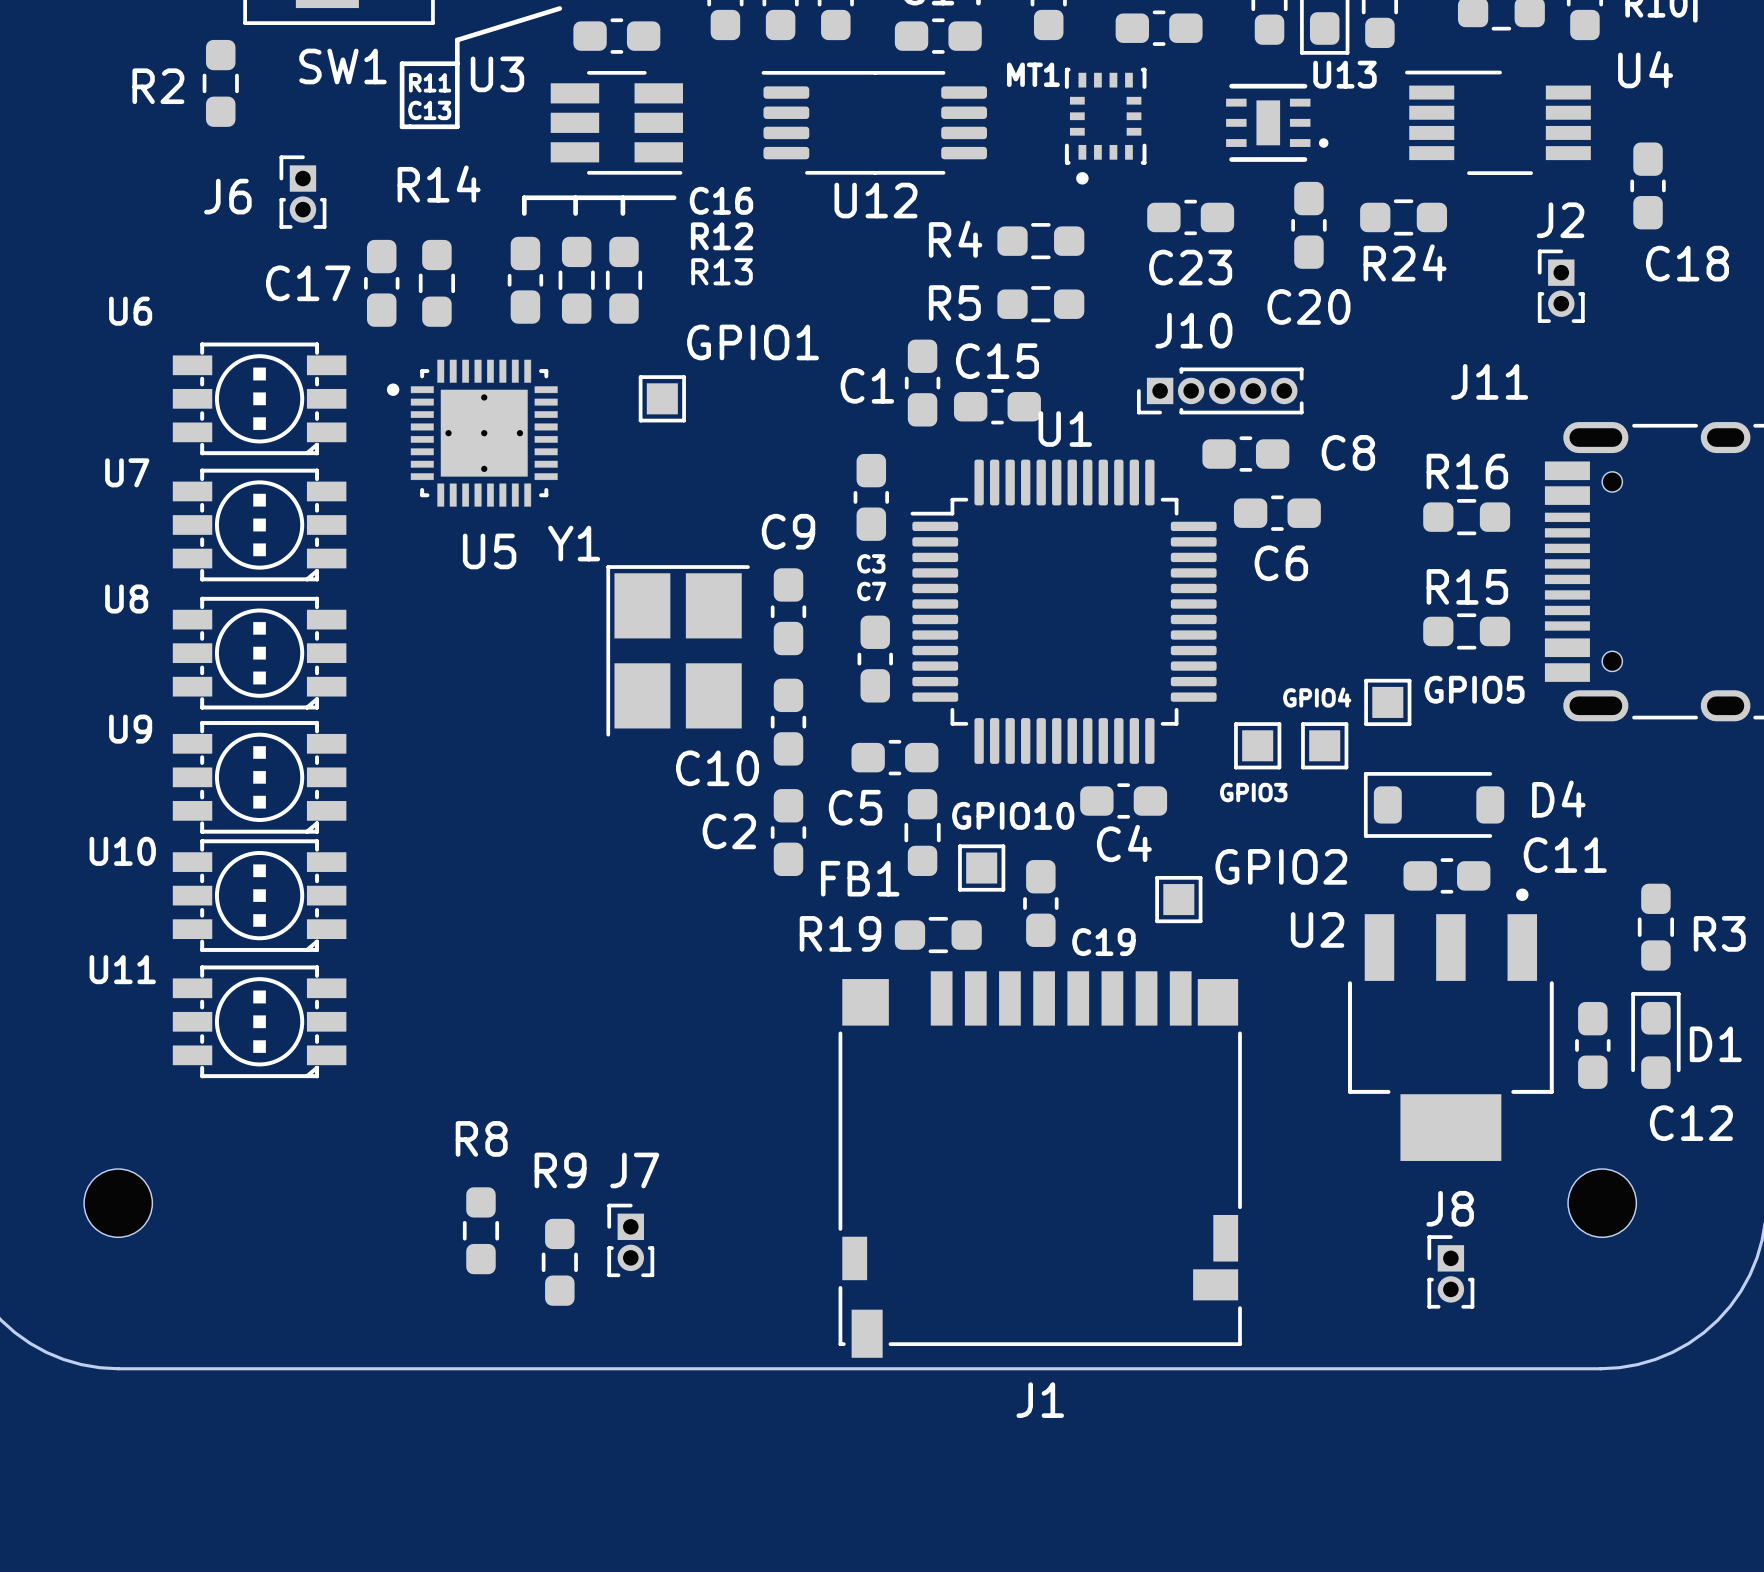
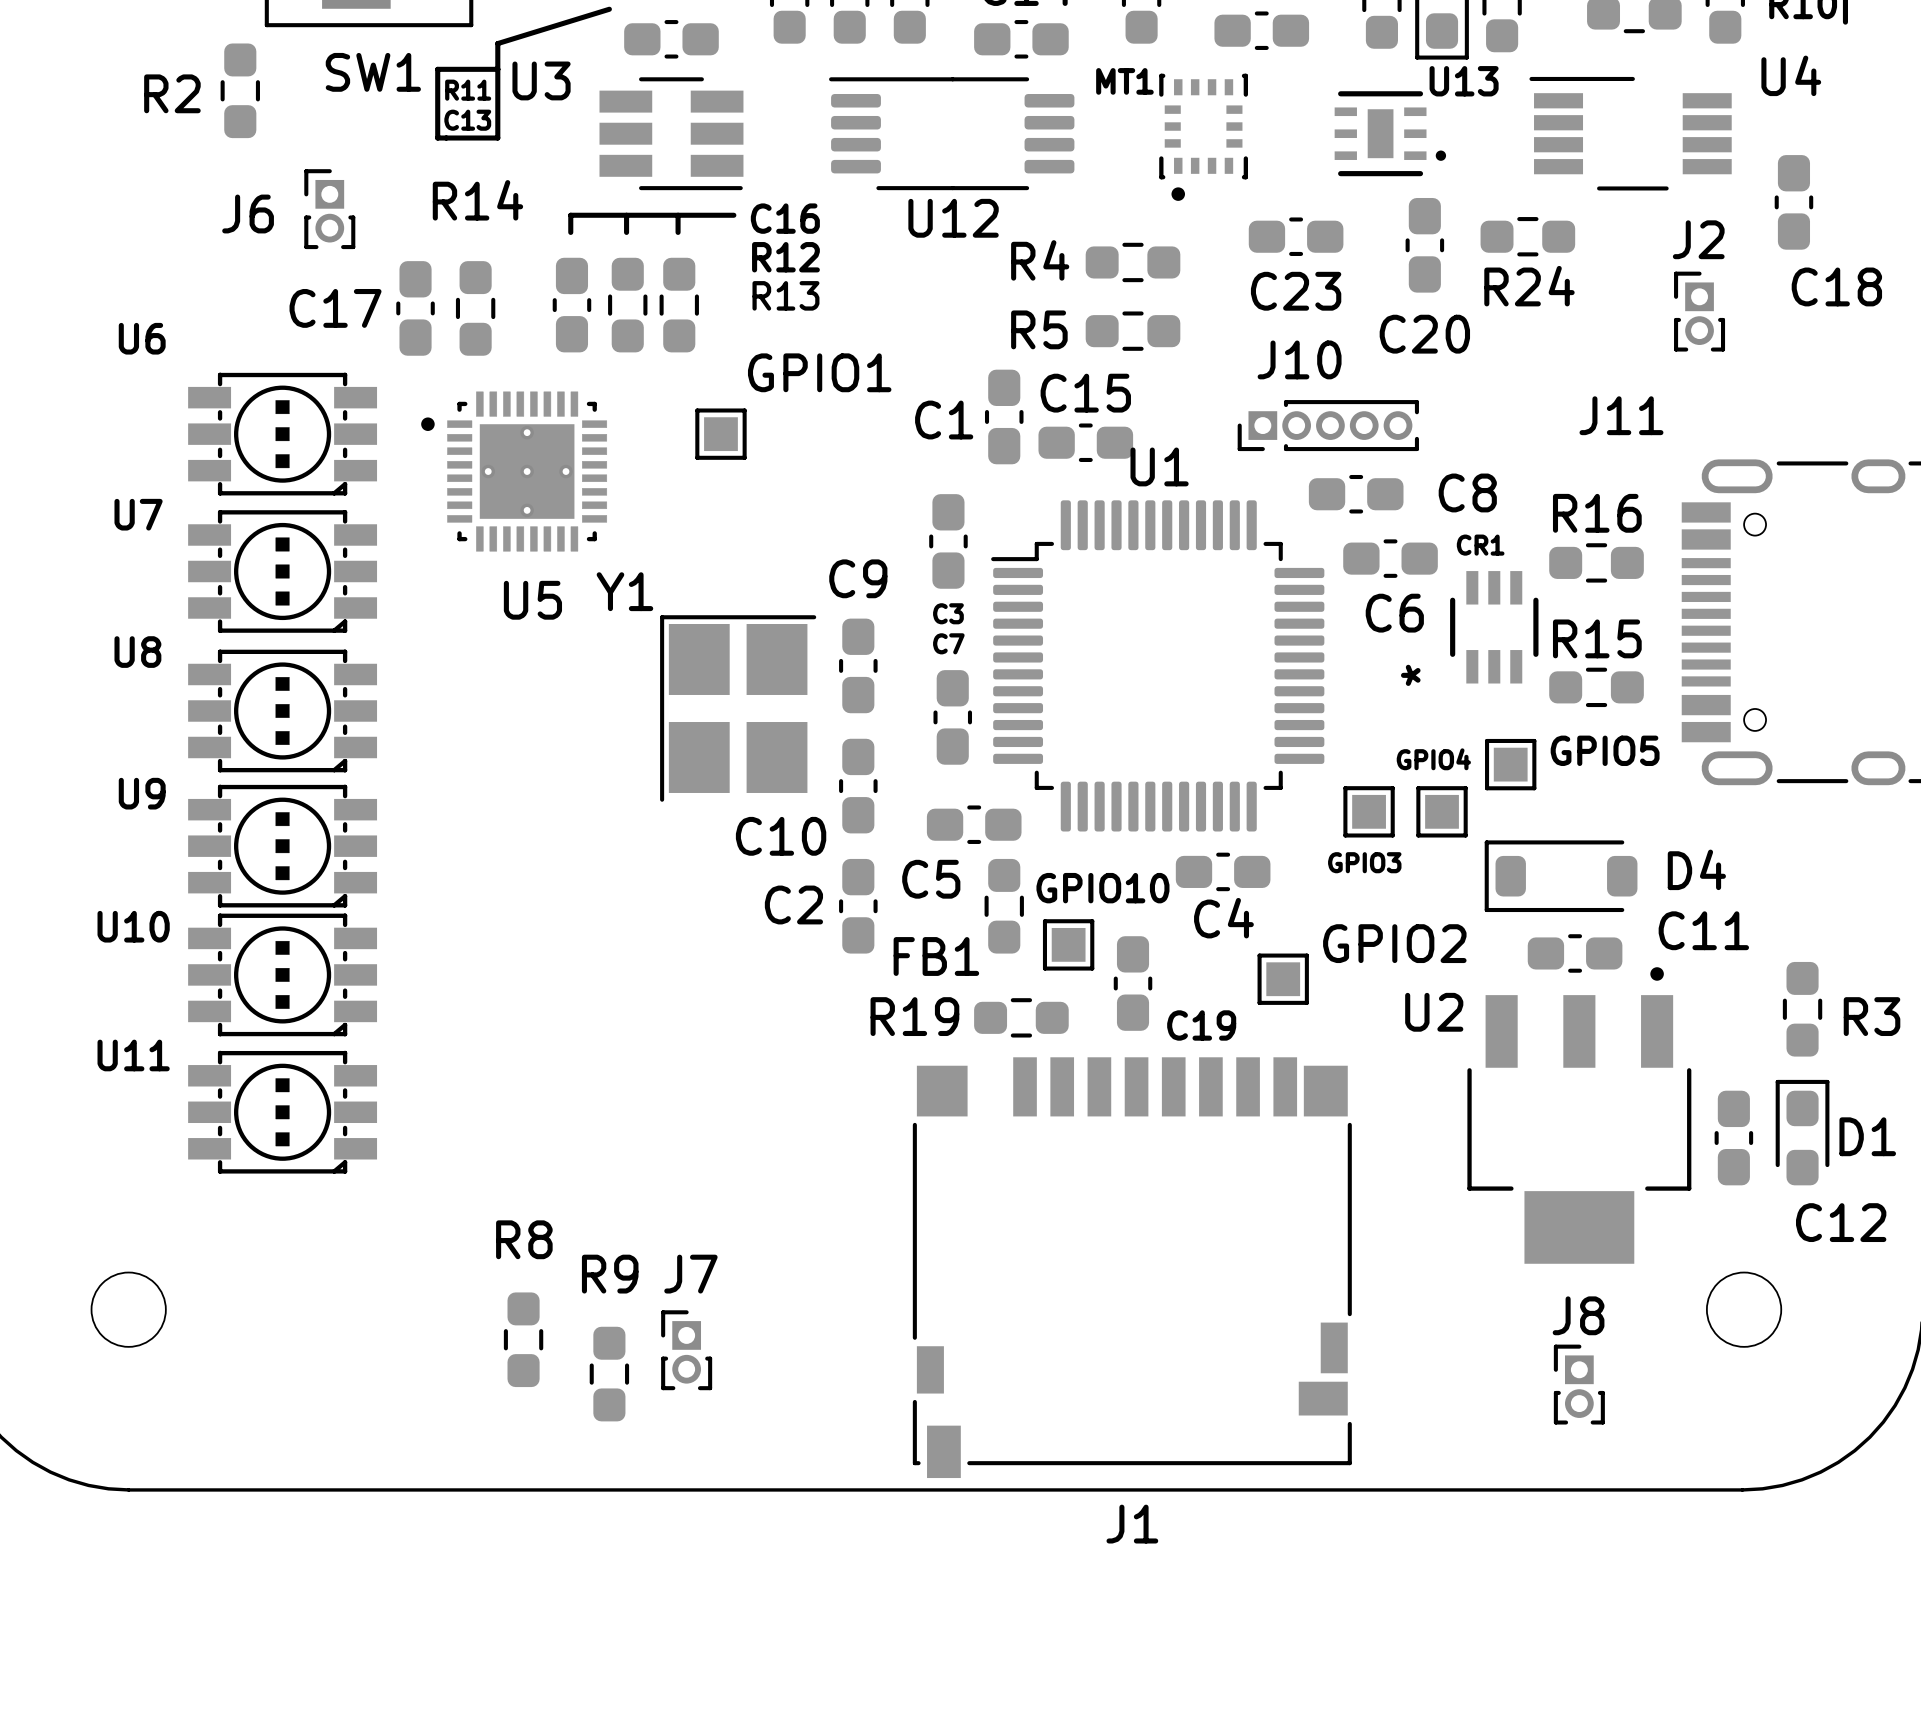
CR1: none -> (1494, 627)

